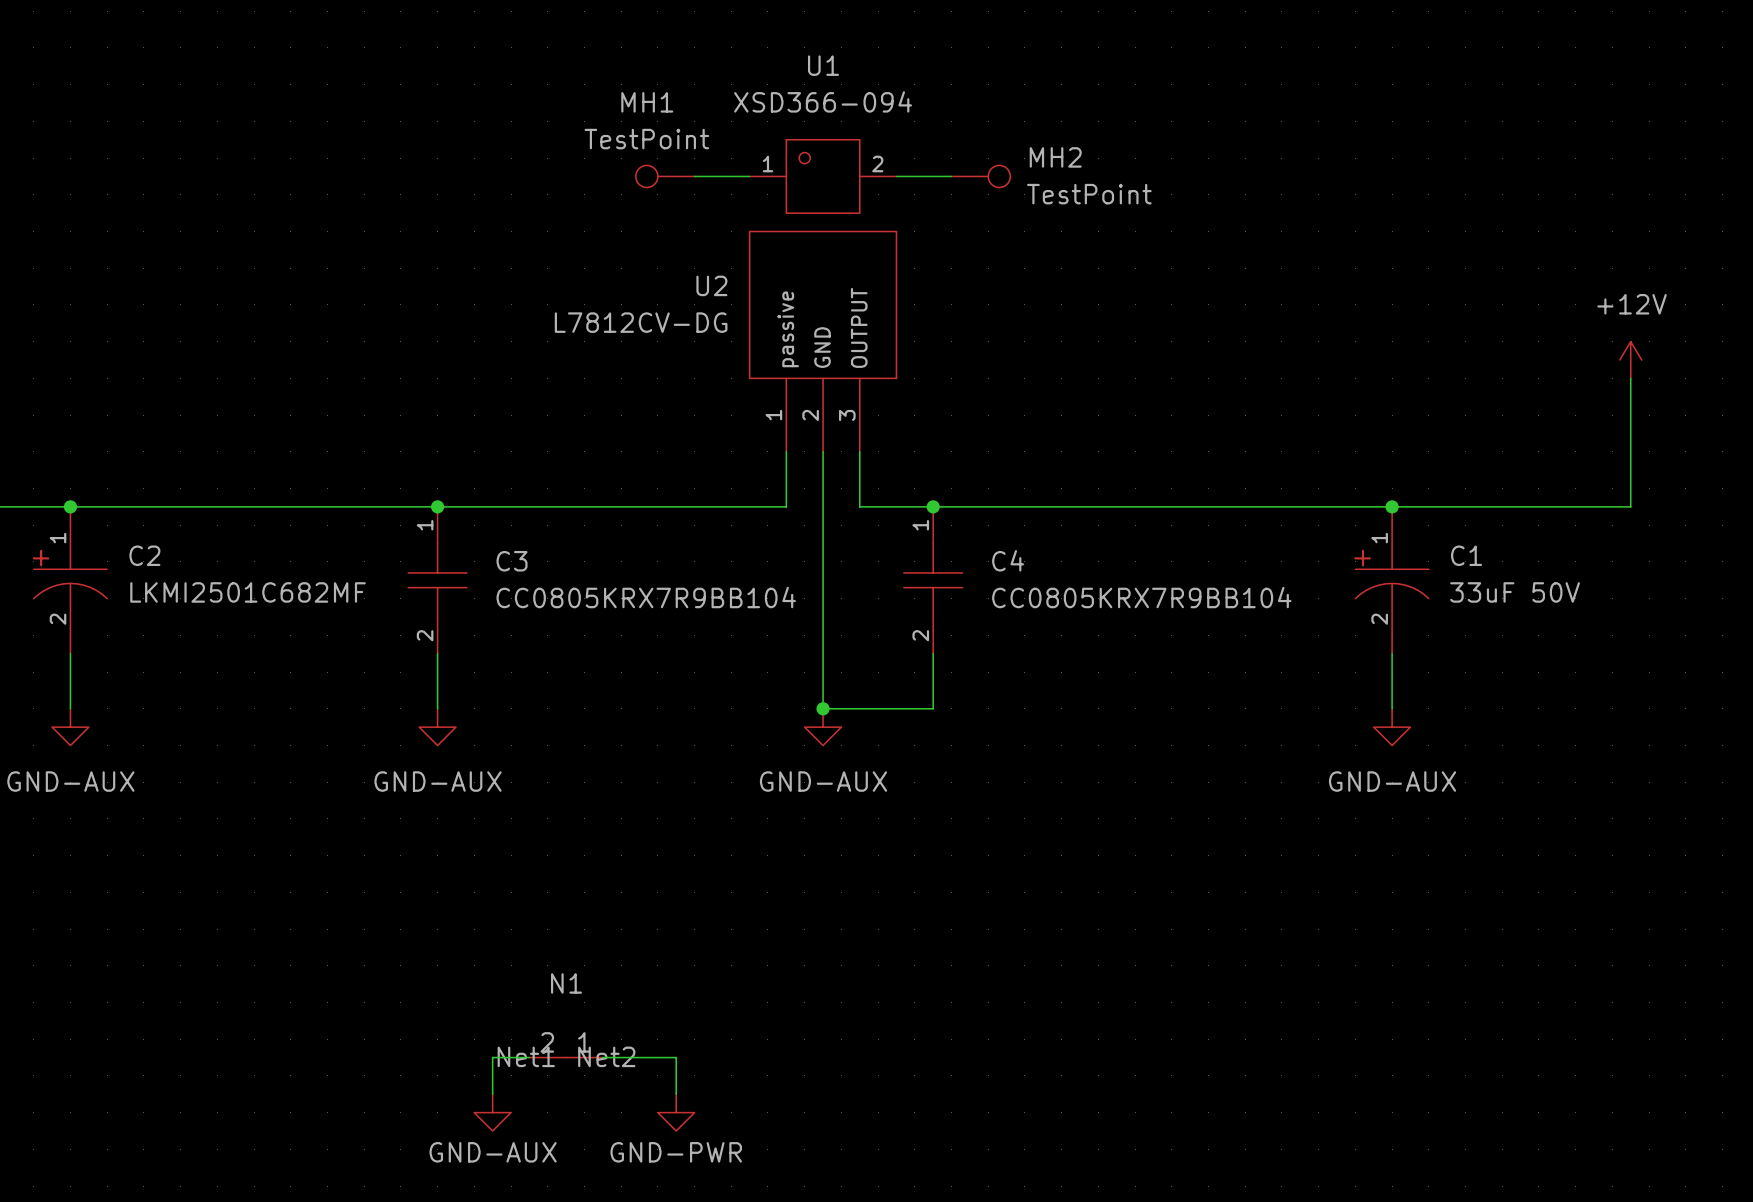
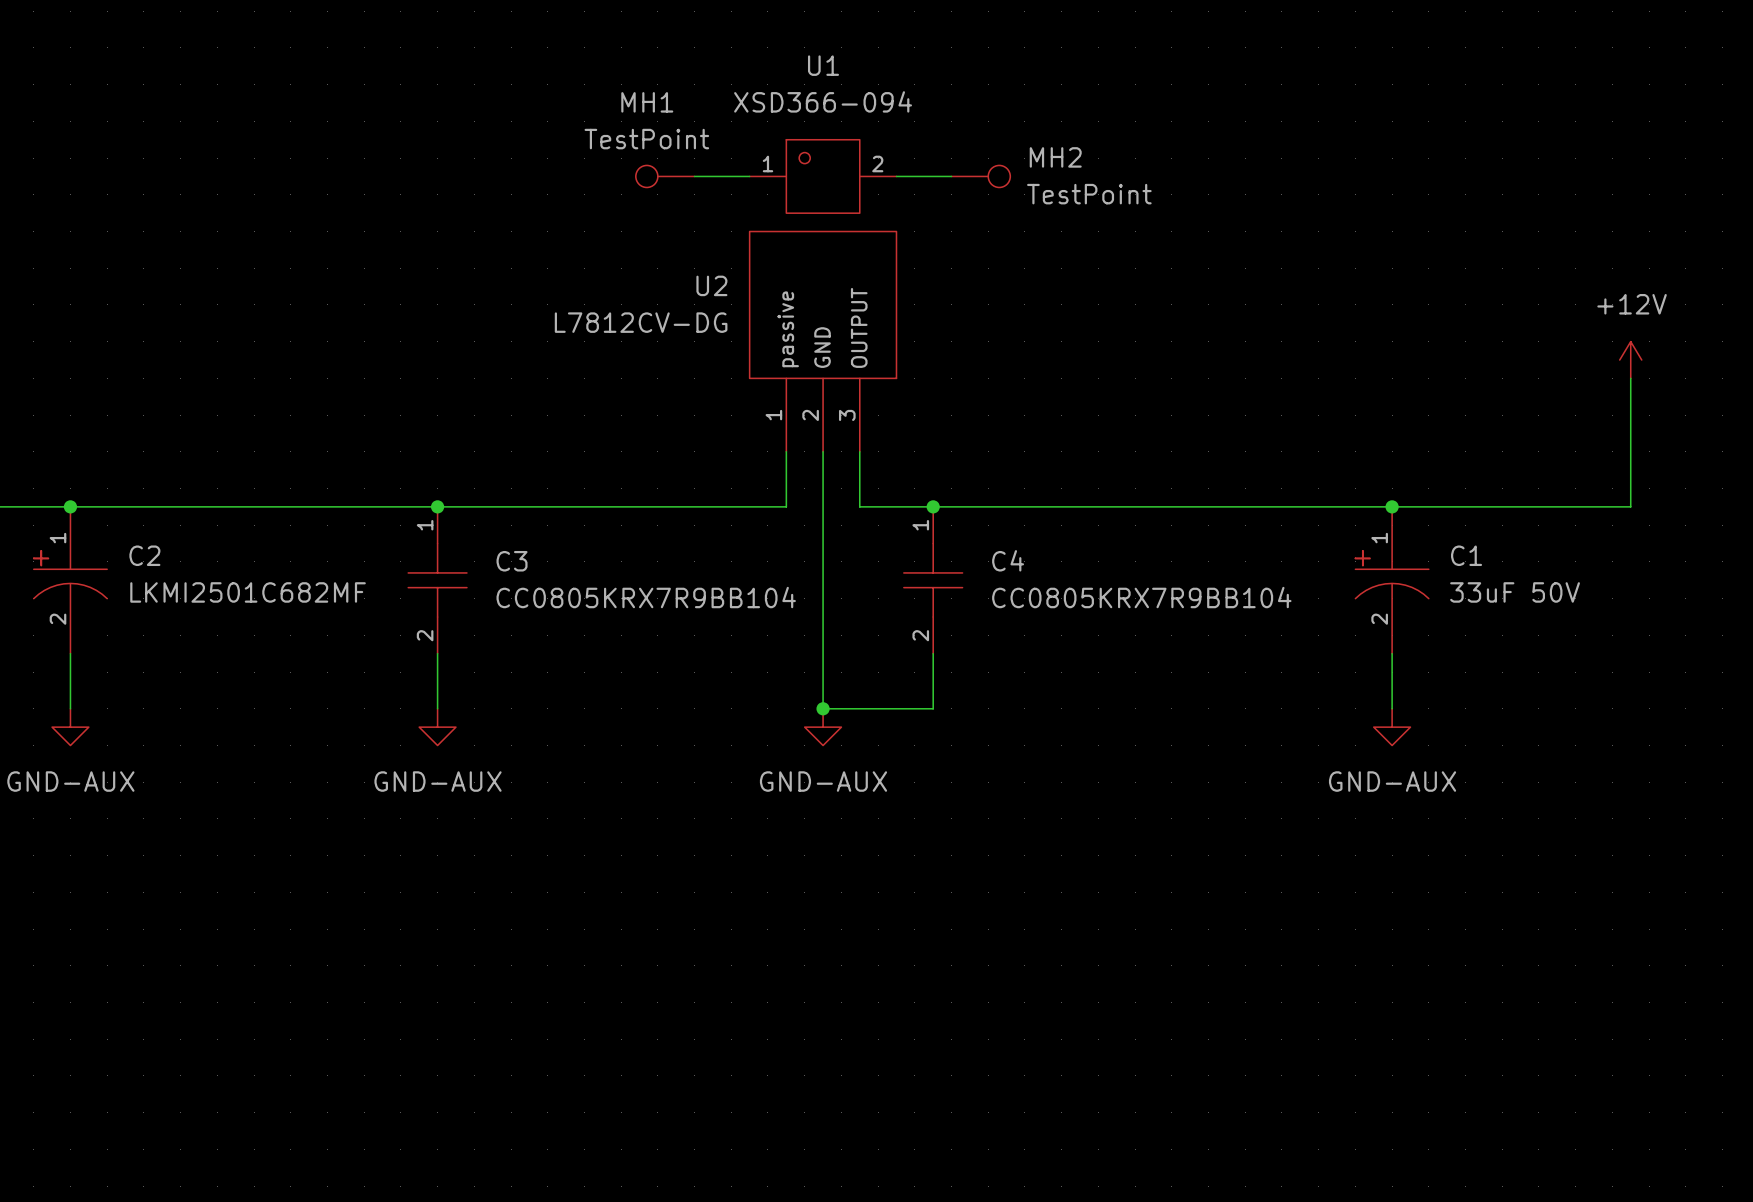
wire: (529, 1057) (492, 1057) (492, 1094) -> none
N1: (566, 1057) -> none
wire: (602, 1057) (676, 1057) (676, 1094) -> none
power symbol: GND-AUX (492, 1112) -> none
power symbol: GND-PWR (676, 1112) -> none

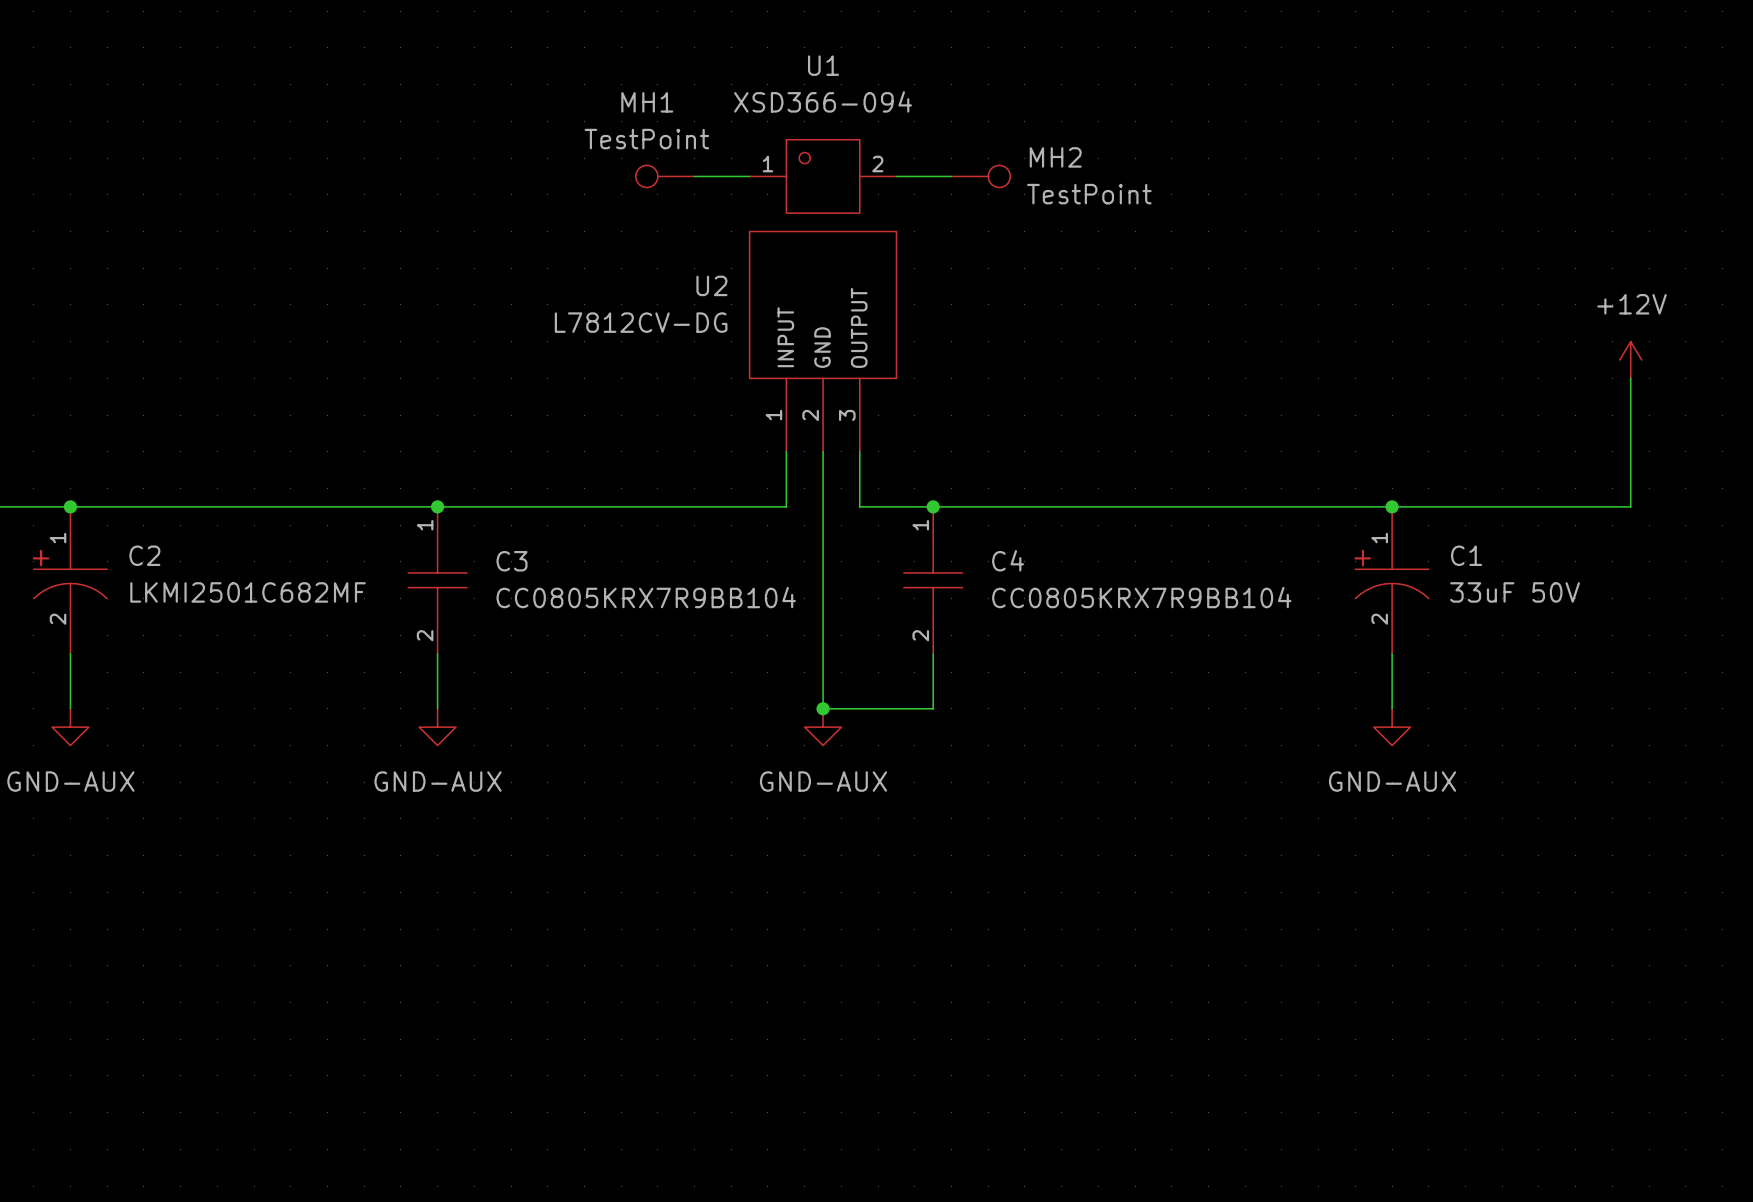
U2 pin name: passive (788, 329) -> INPUT (785, 337)

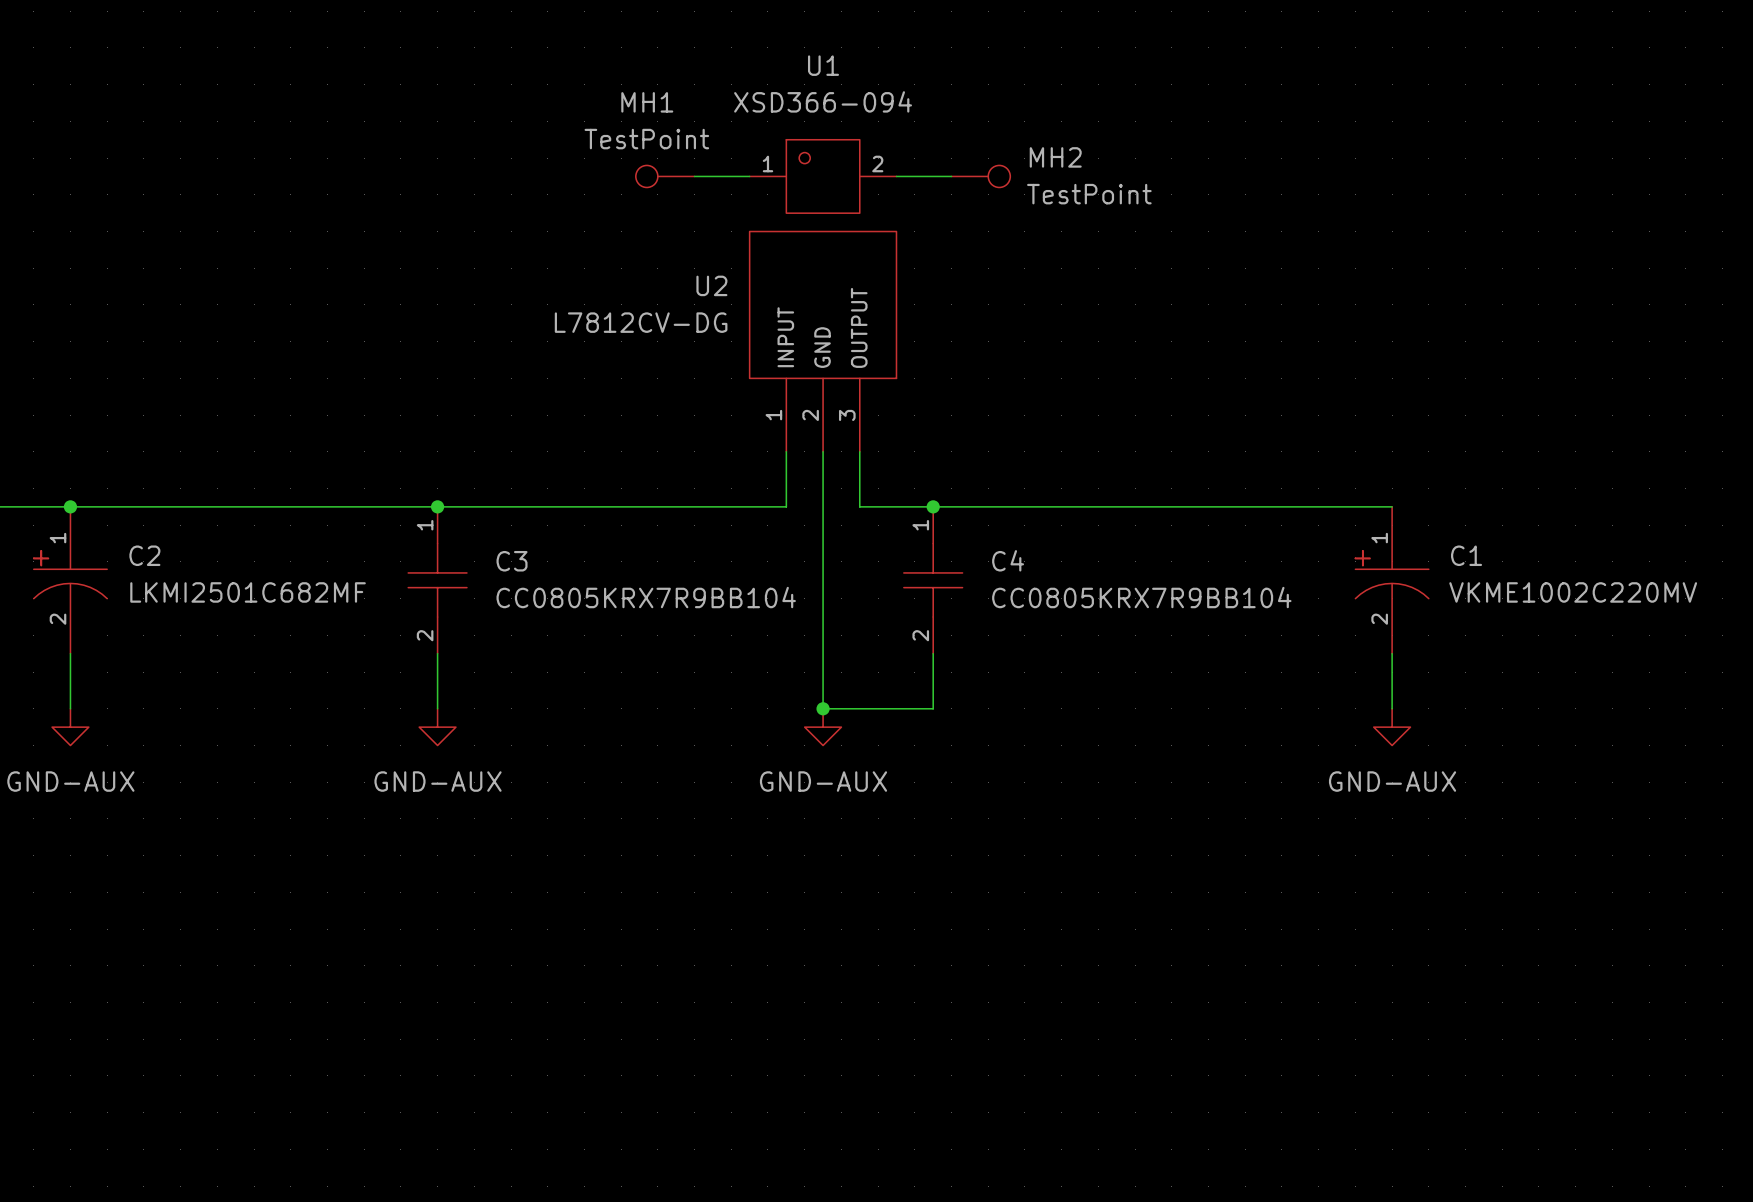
power symbol: +12V (1630, 360) -> none
wire: (1630, 378) (1630, 506) (1392, 506) -> none
junction: (1392, 506) -> none
C1 value: 33uF 50V (1515, 592) -> VKME1002C220MV (1573, 592)

